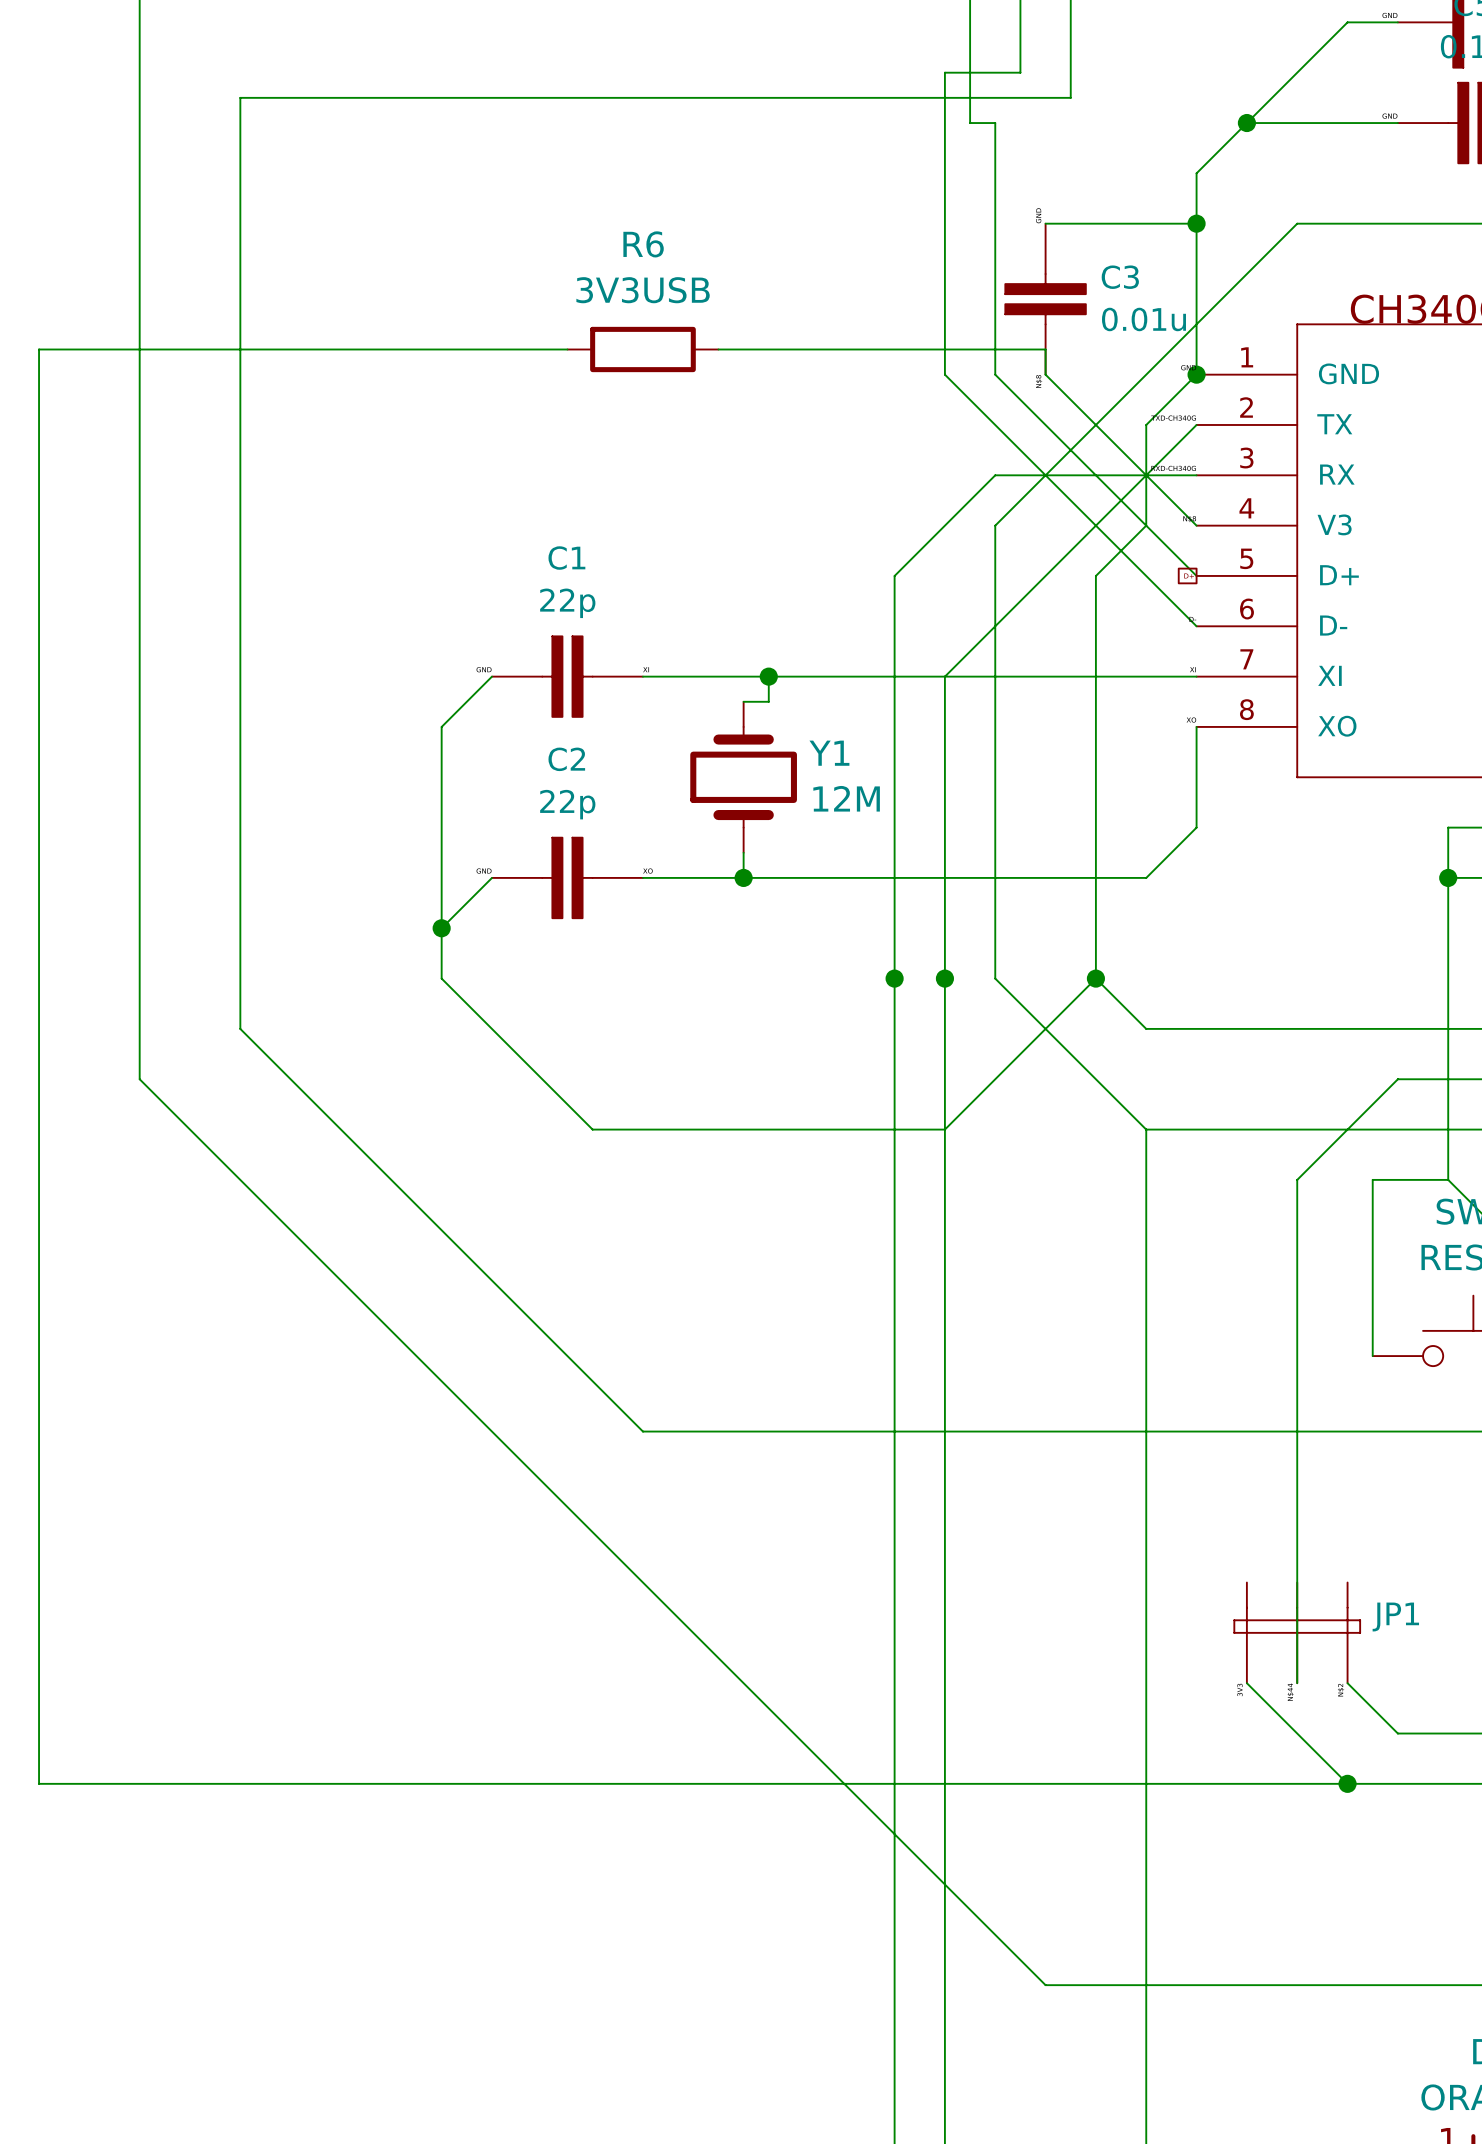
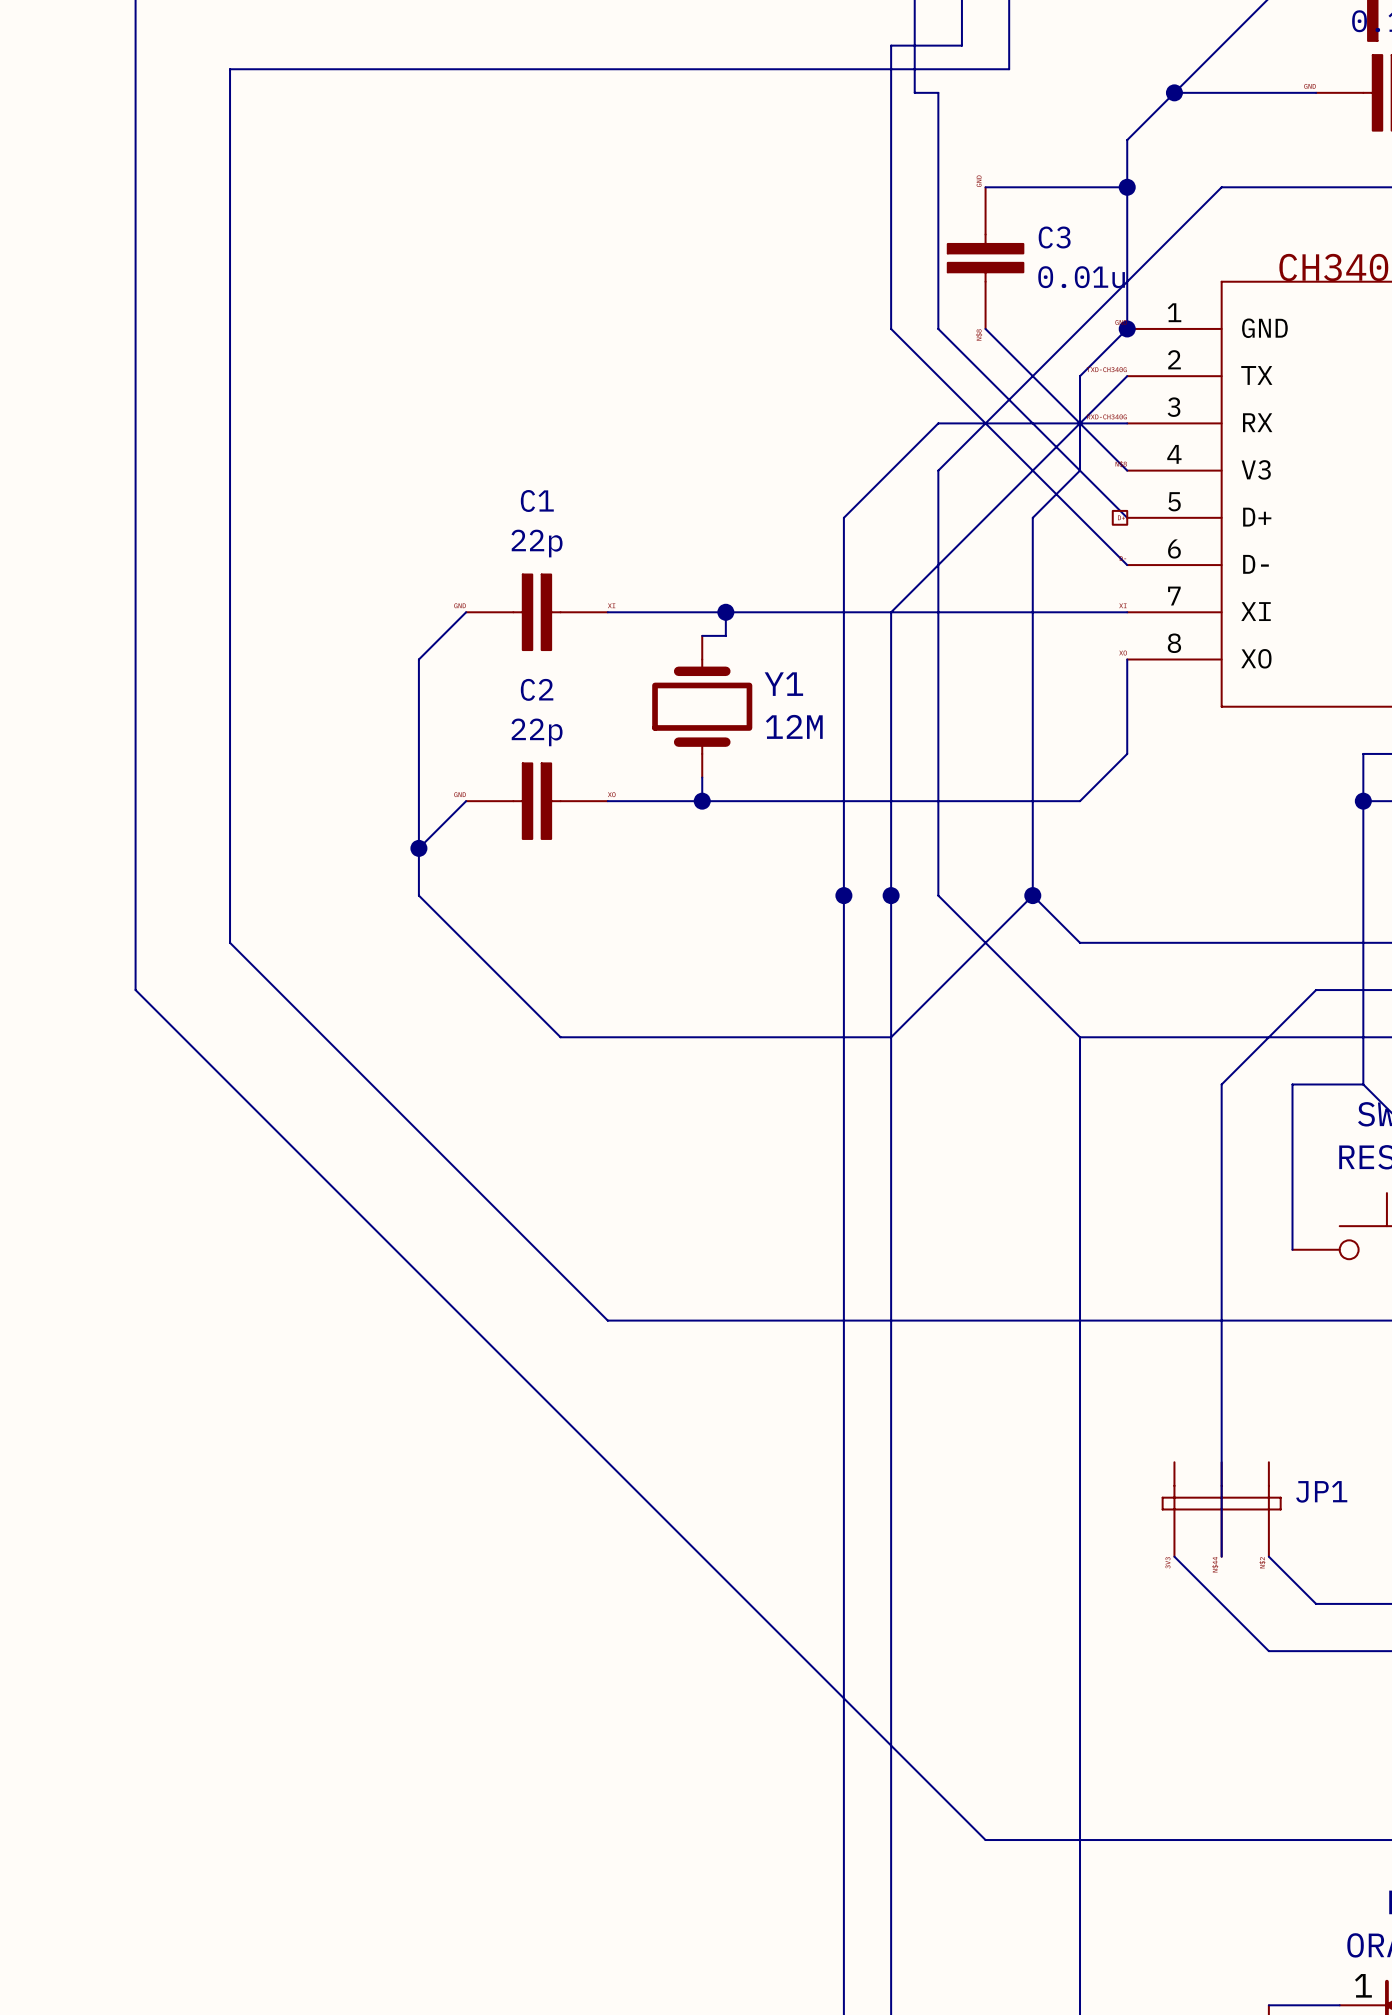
wire: (567, 349) (39, 349) (39, 1783) (1347, 1783) -> none
R6: 3V3USB (642, 349) -> none
wire: (718, 349) (1045, 349) (1045, 374) -> none
junction: (1347, 1783) -> none

